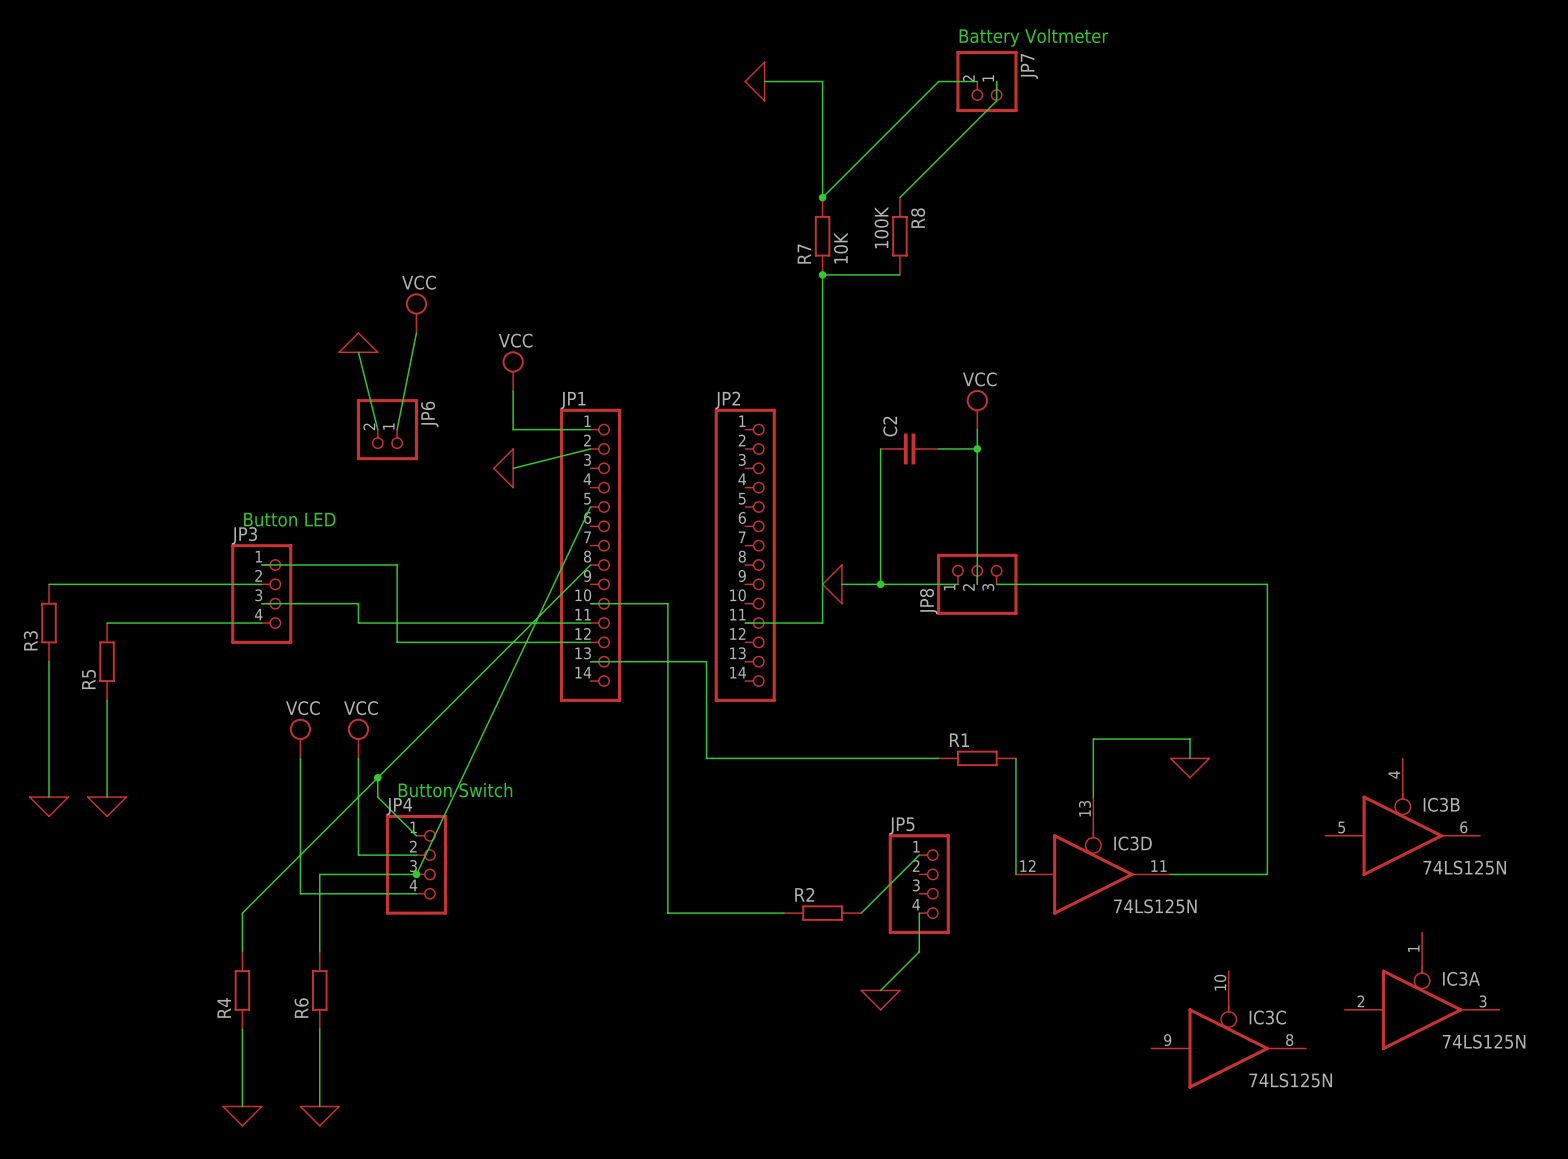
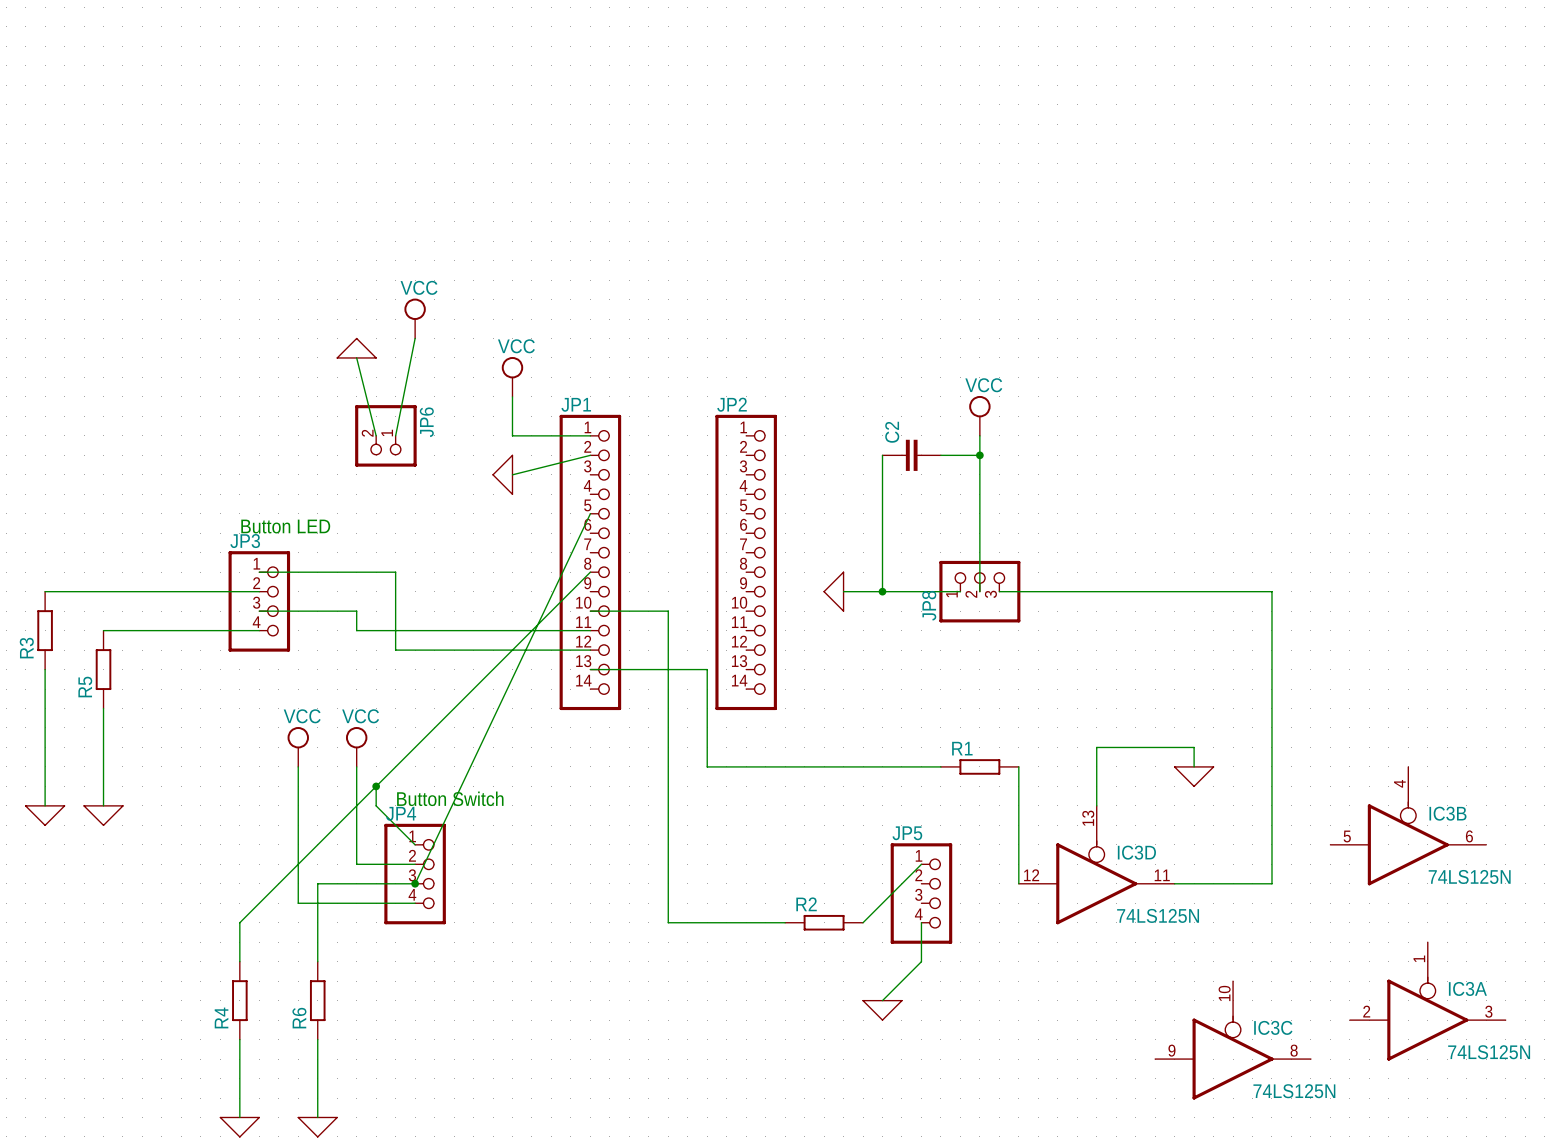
text: Battery Voltmeter (1033, 37) -> none
power symbol: (754, 81) -> none
wire: (764, 81) (822, 81) (822, 197) (938, 81) (977, 81) -> none
JP7: (986, 81) -> none
wire: (996, 81) (996, 100) (899, 197) -> none
junction: (822, 197) -> none
R7: 10K (822, 236) -> none
R8: 100K (899, 236) -> none
junction: (822, 274) -> none
wire: (899, 274) (822, 274) (822, 623) (745, 623) -> none

